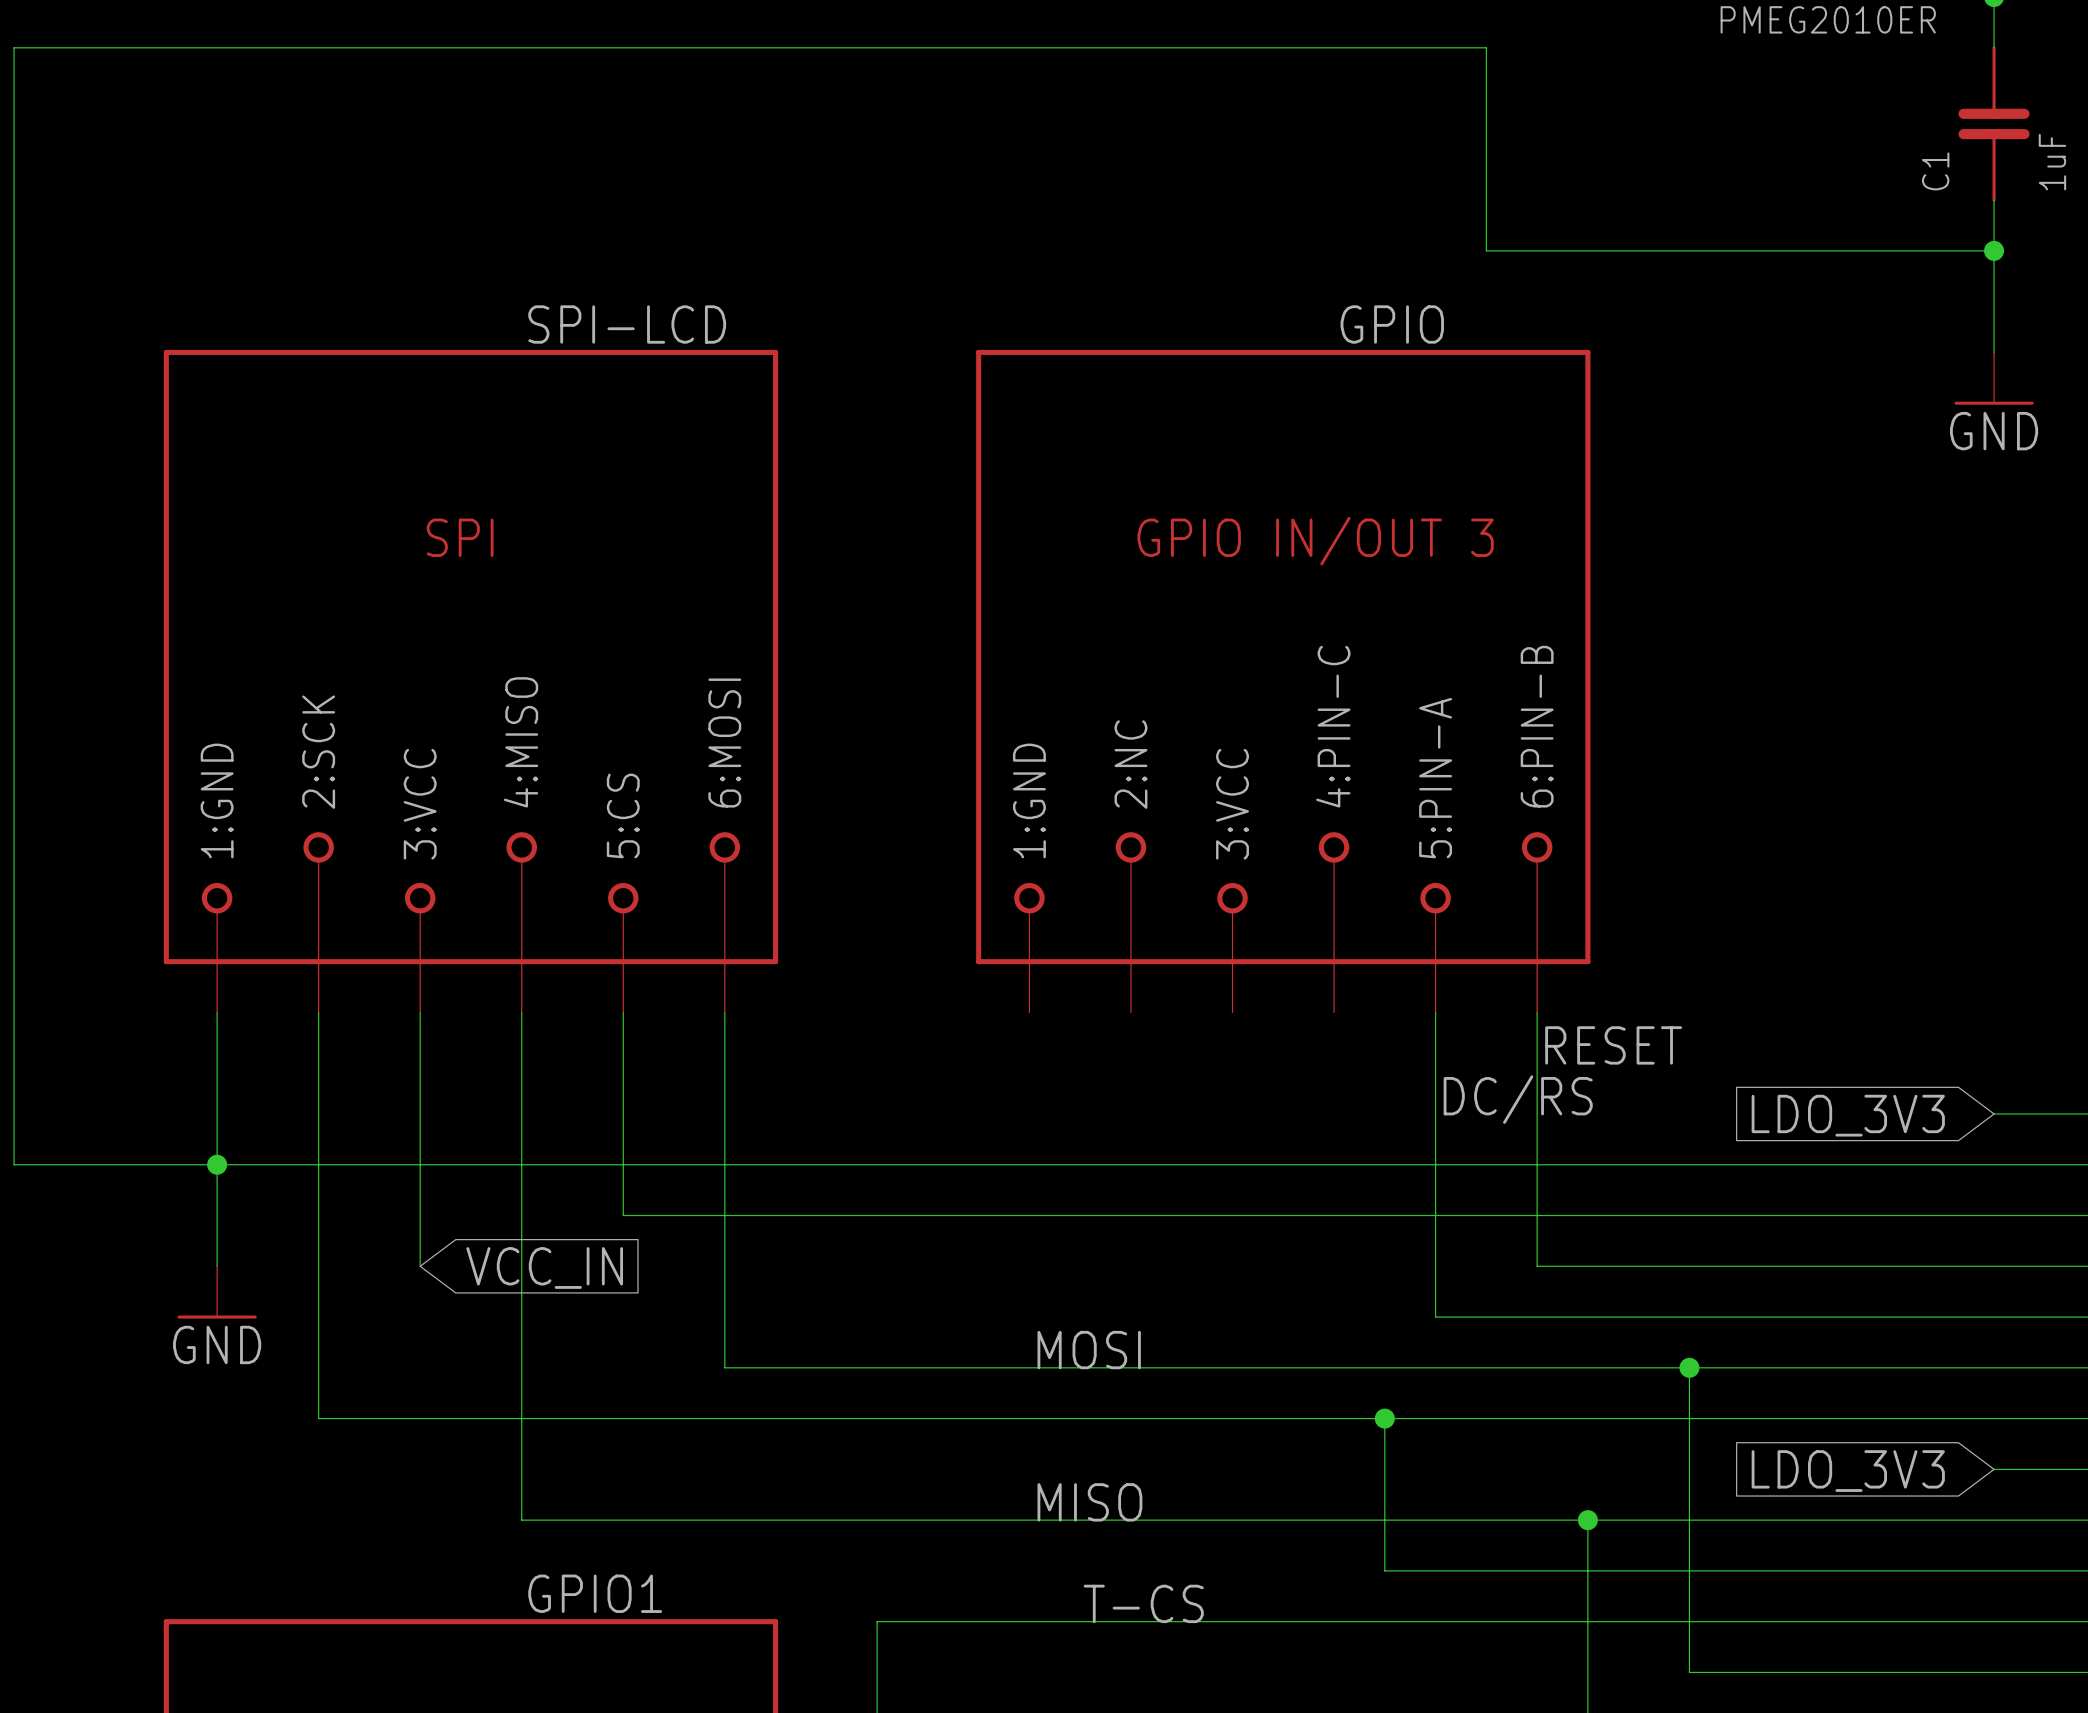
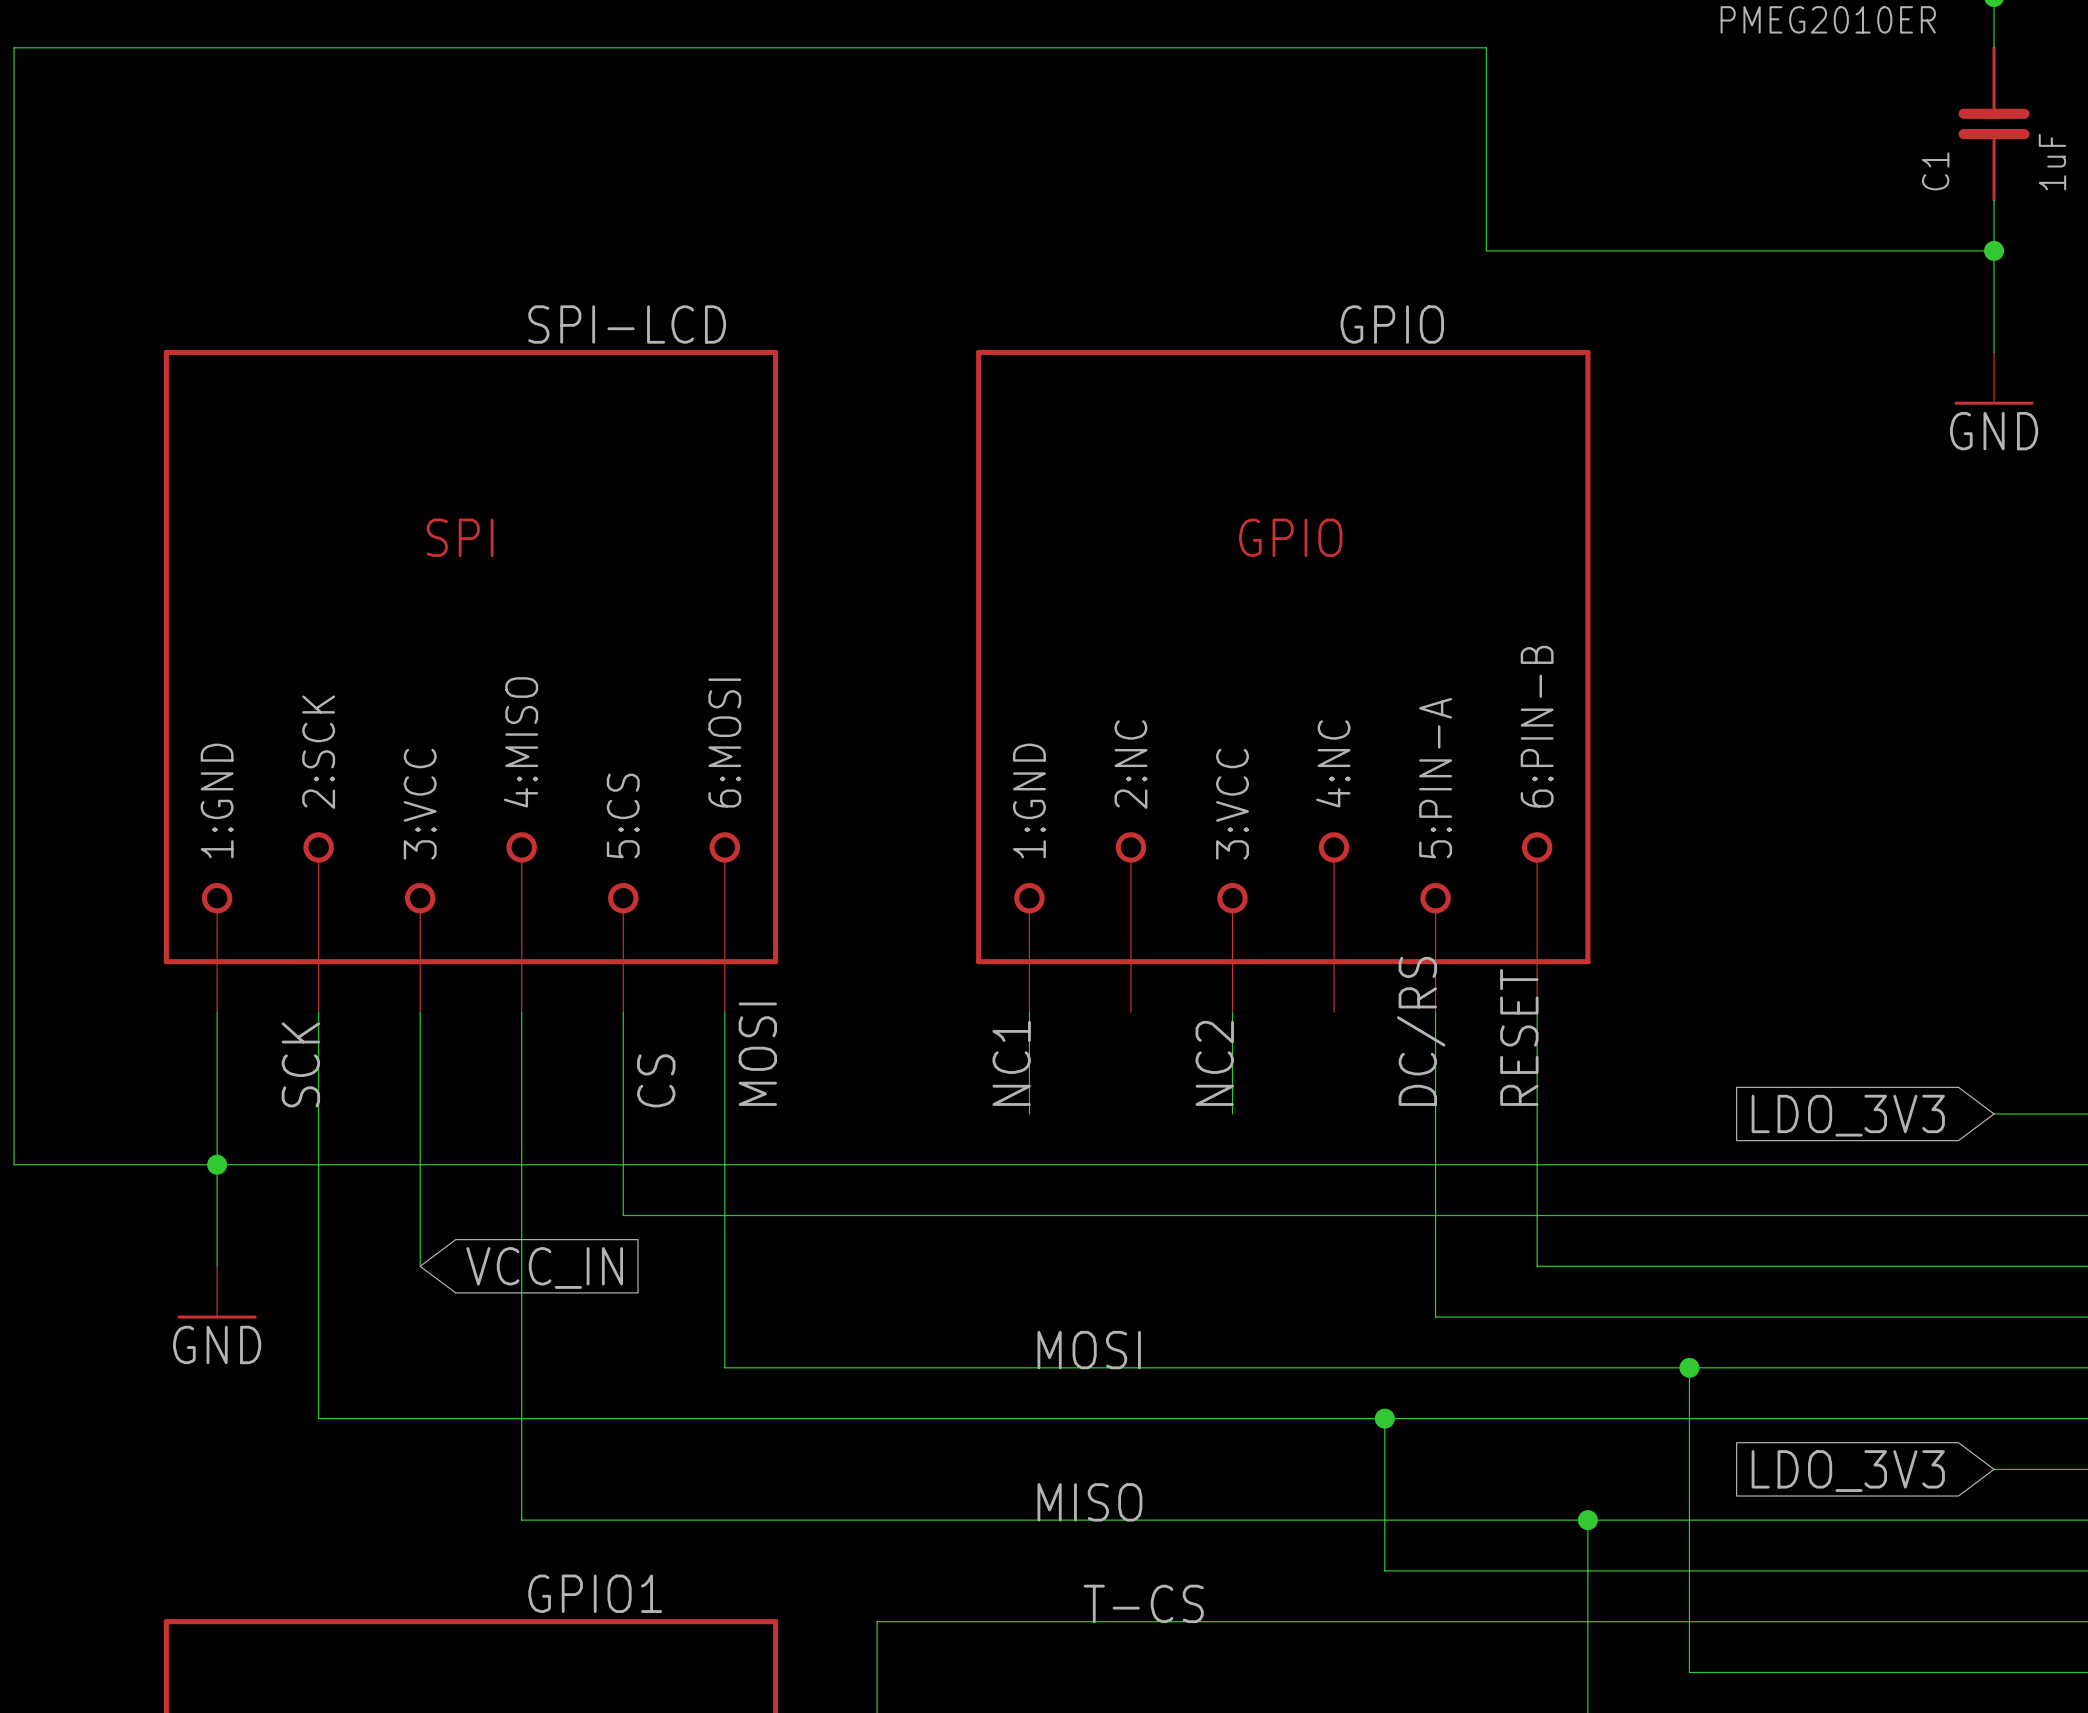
GPIO text: none -> GPIO (1290, 537)
GPIO text: GPIO IN/OUT 3 (1315, 541) -> none
GPIO pin name: 4:PIN-C (1333, 726) -> 4:NC (1333, 763)
wire: none -> (1029, 1012) (1029, 1113)
wire: none -> (1232, 1012) (1232, 1113)
label rotation: 0° (1613, 1045) -> 90° counterclockwise (1519, 1037)
label: none -> MOSI (757, 1054)
label: none -> NC1 (1011, 1063)
label: none -> NC2 (1214, 1063)
label: none -> SCK (300, 1064)
label: none -> CS (656, 1080)
label rotation: 0° (1518, 1099) -> 90° counterclockwise (1421, 1031)

